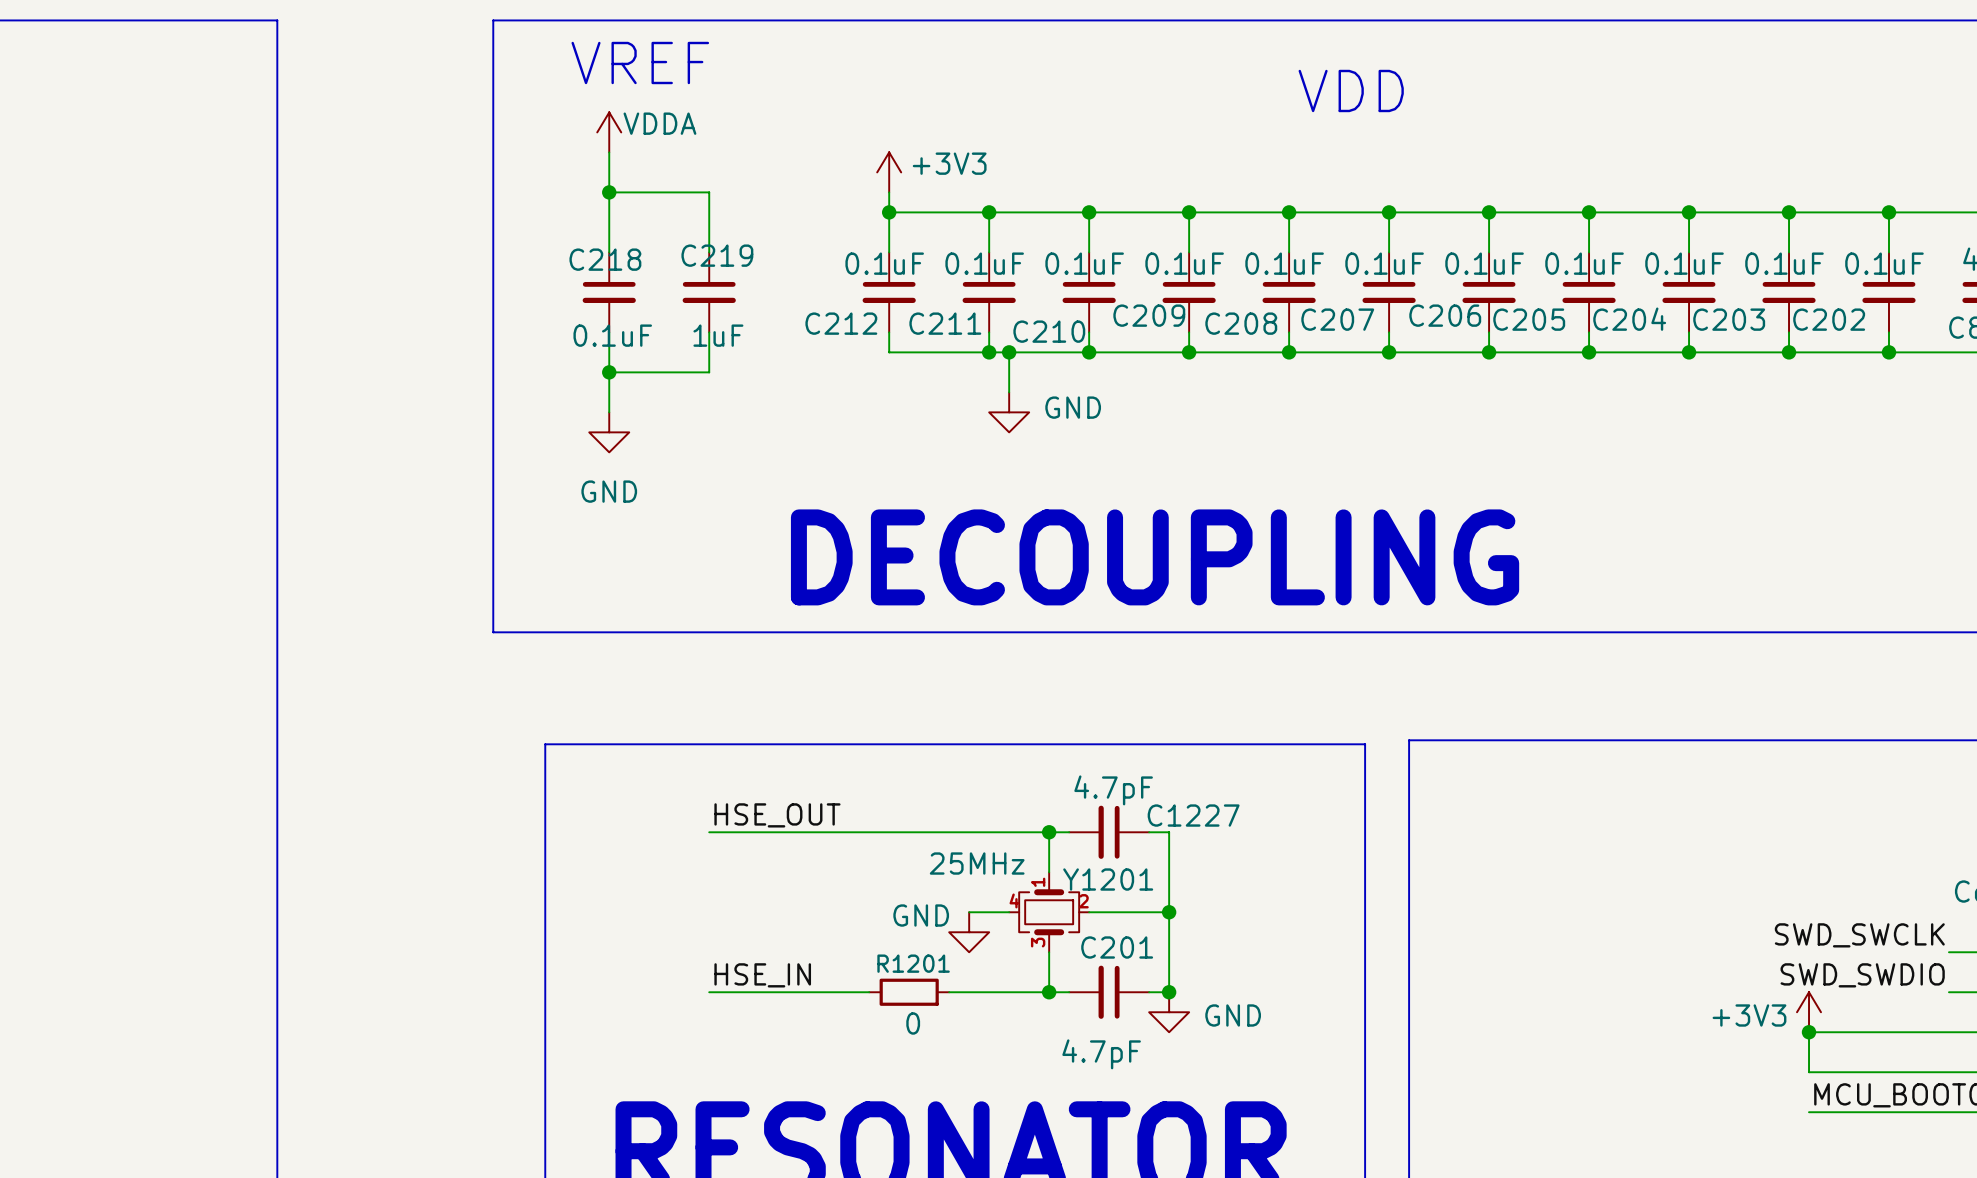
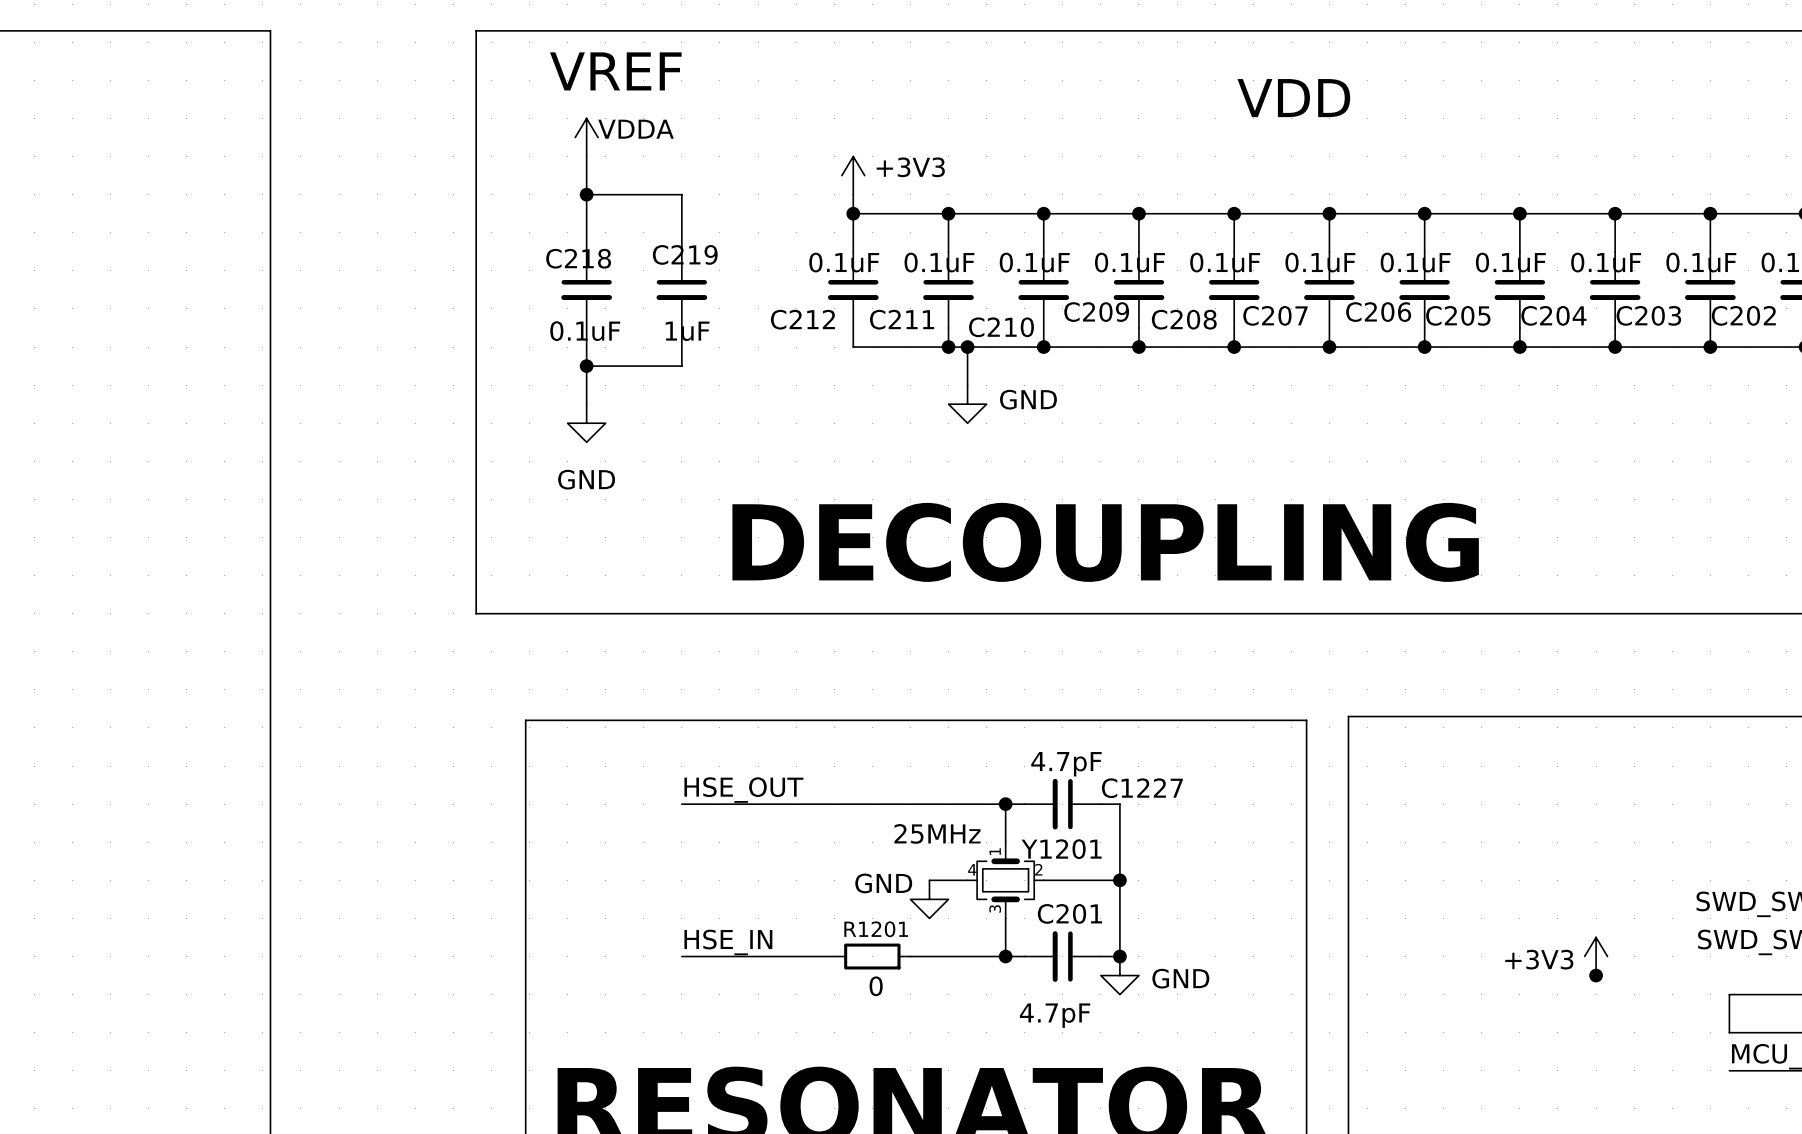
junction: none -> (1596, 975)
power symbol position: +3V3 (1809, 1012) -> +3V3 (1596, 956)
junction: (1809, 1032) -> none

